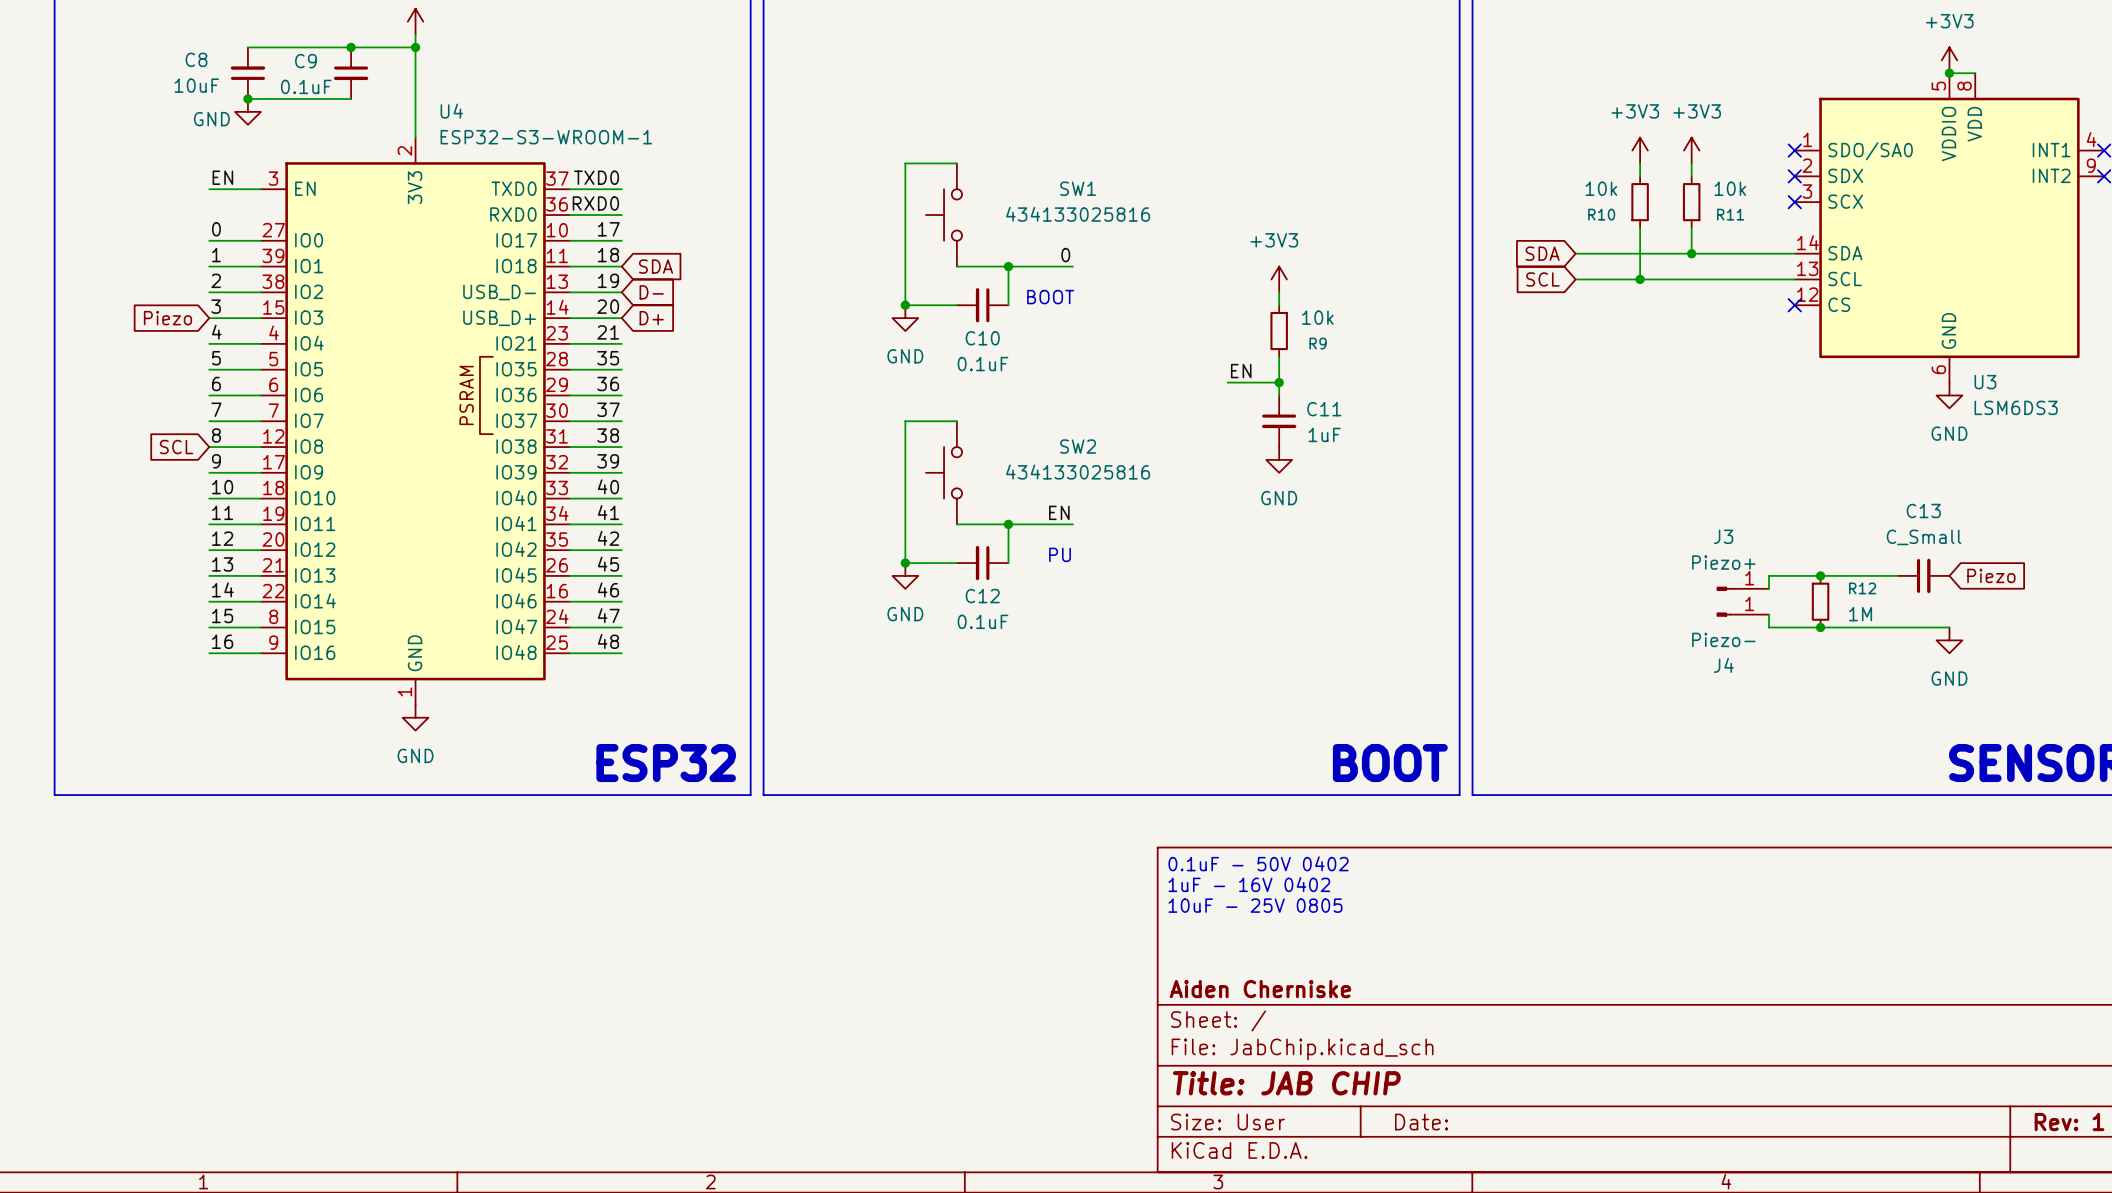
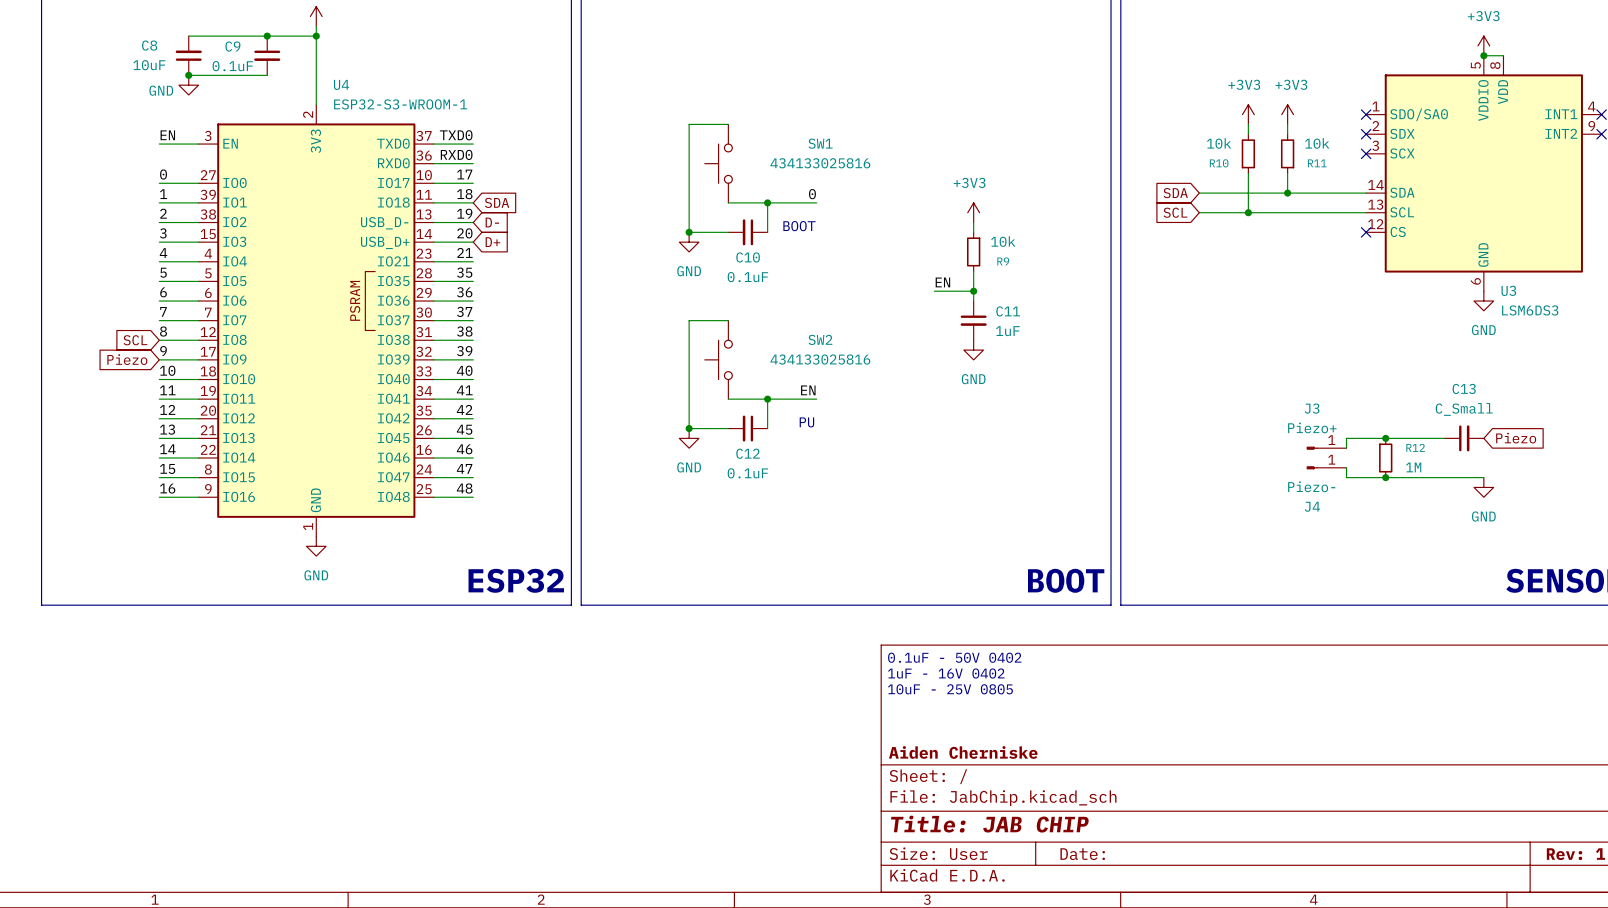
global label position: Piezo (167, 318) -> Piezo (127, 359)

